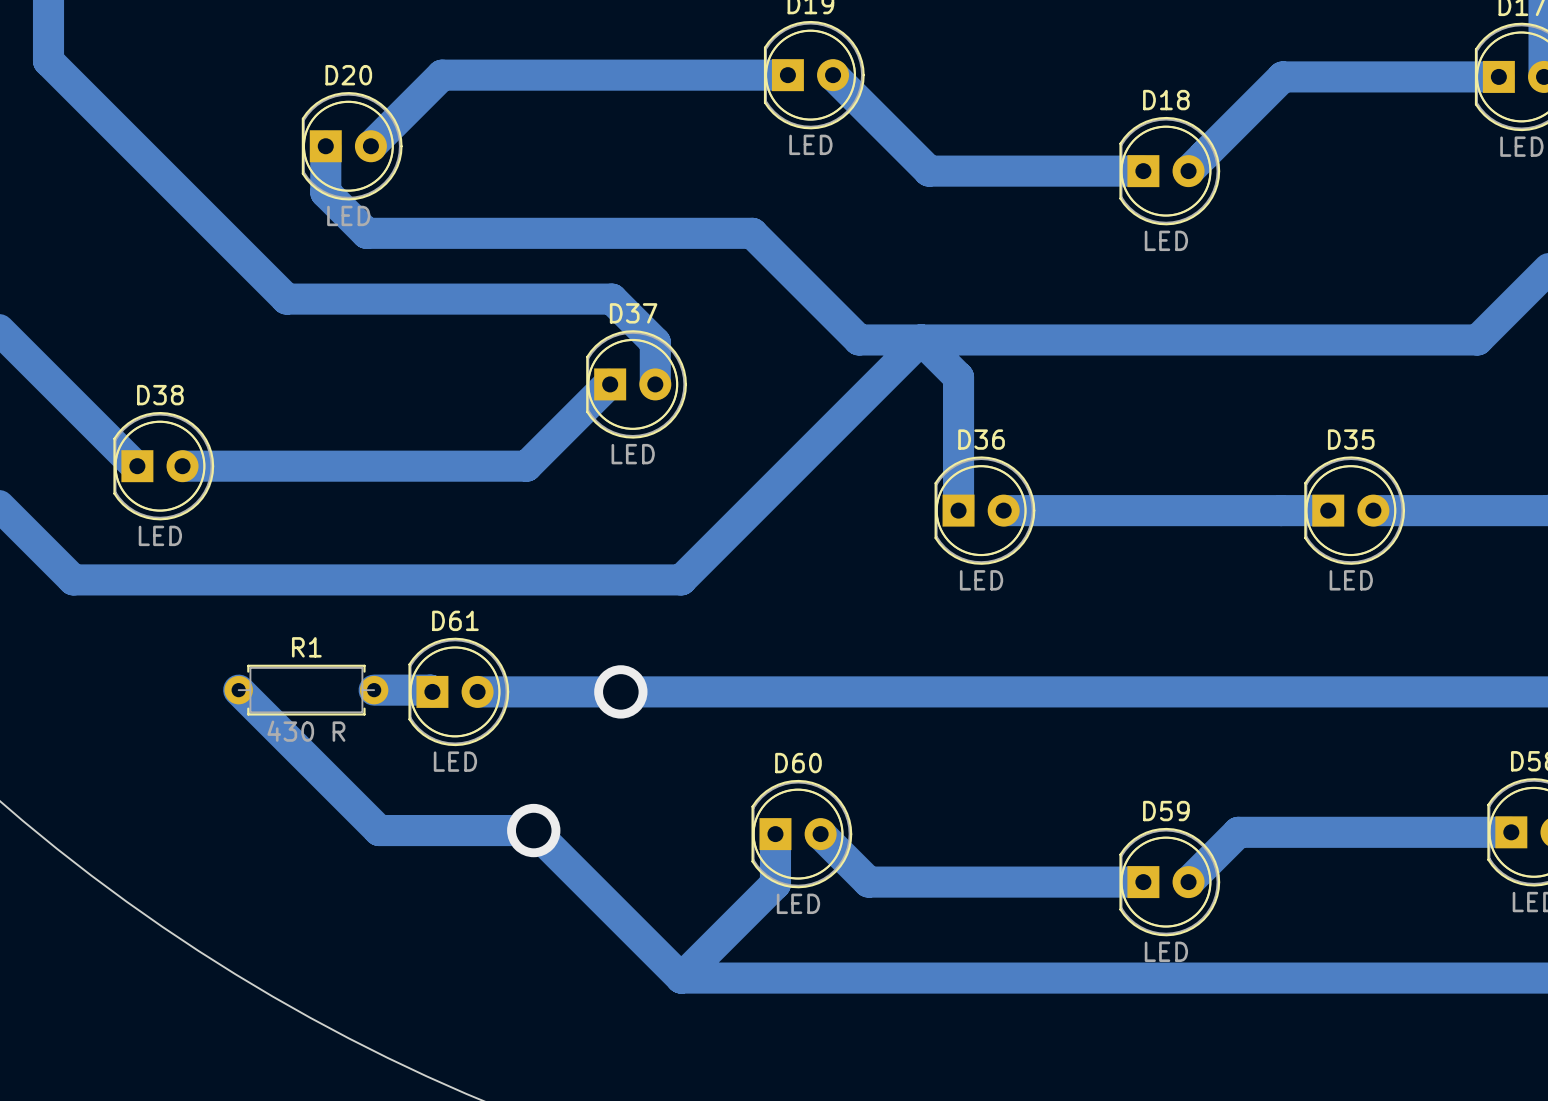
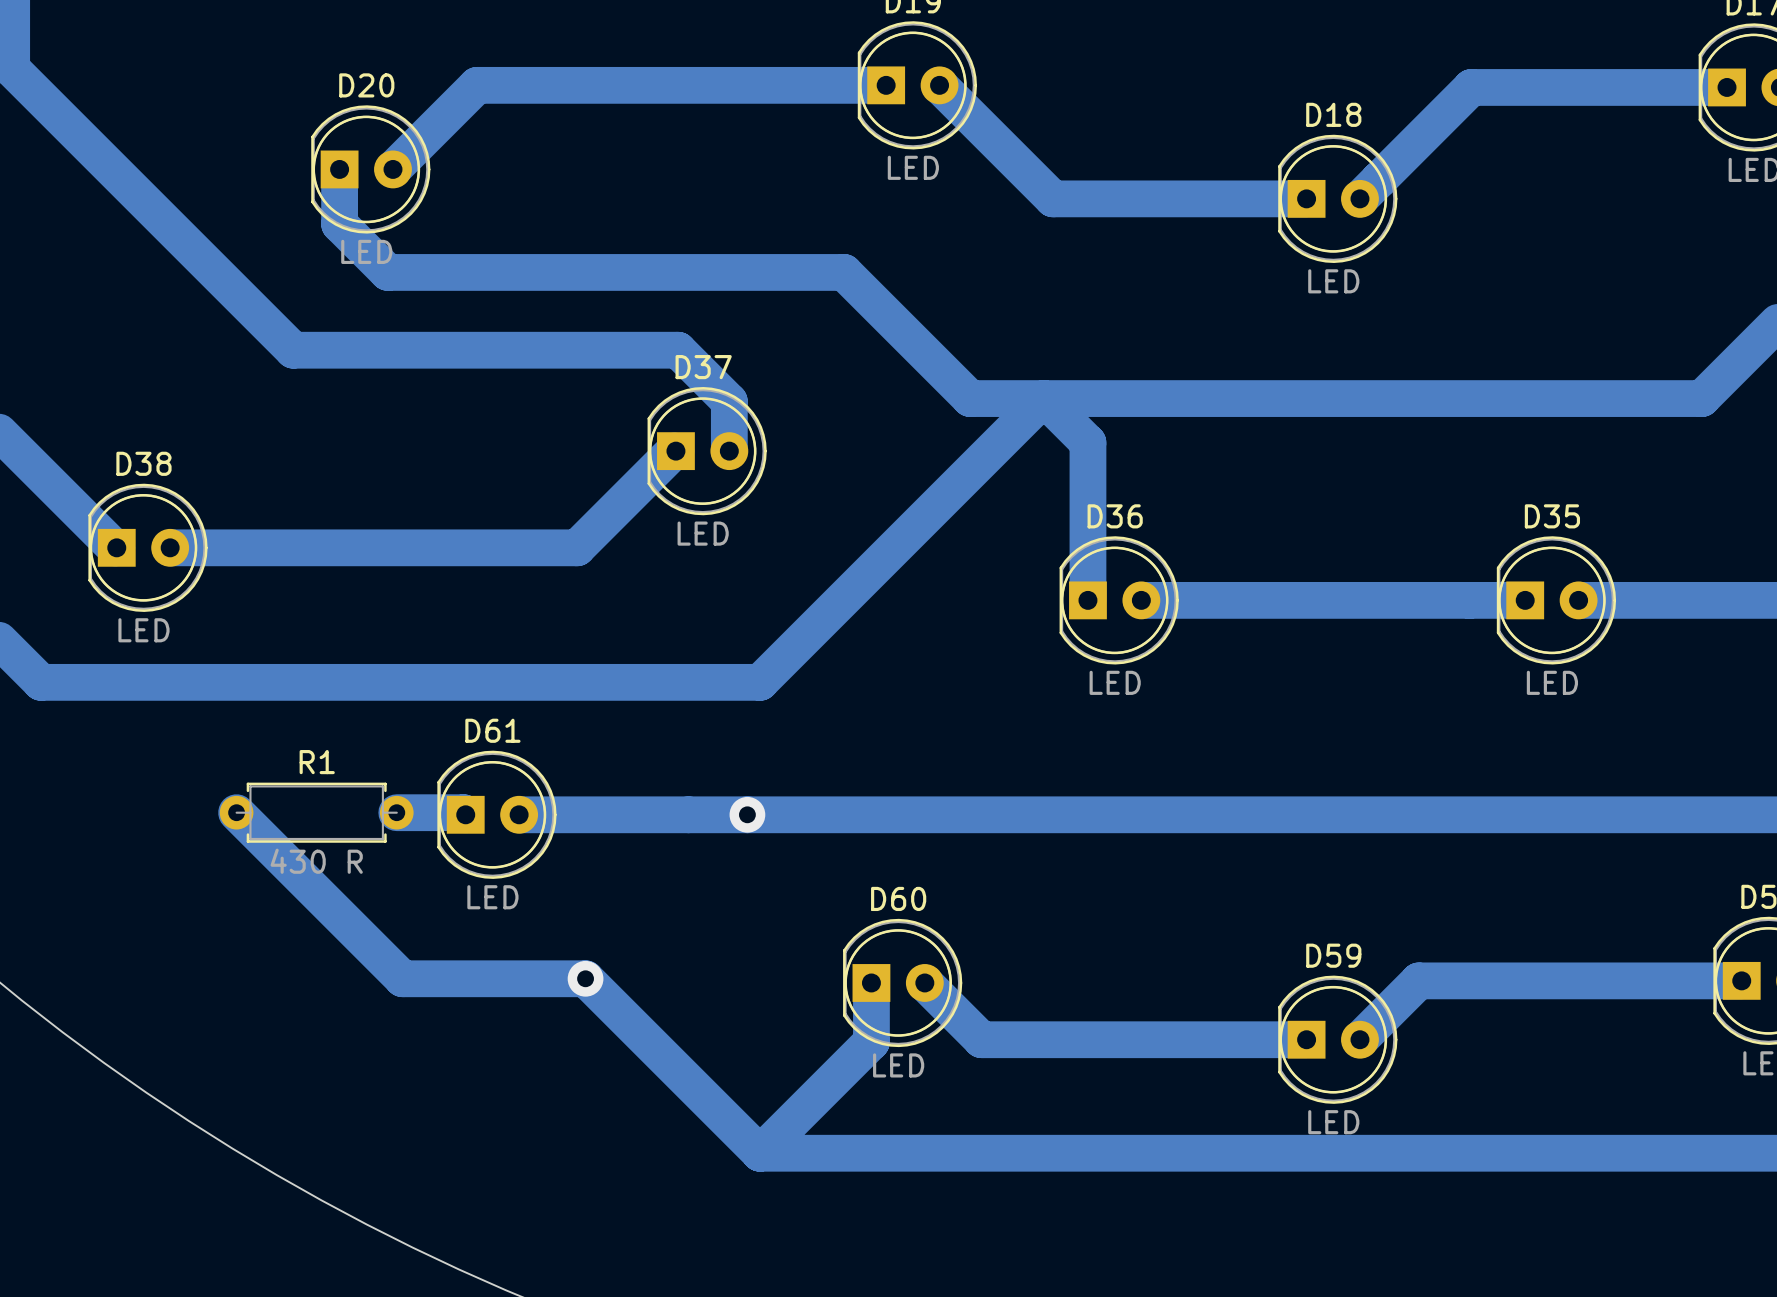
via: (620, 691) -> none
via: none -> (747, 814)
via size: [507, 803, 561, 858] -> [567, 960, 604, 997]

